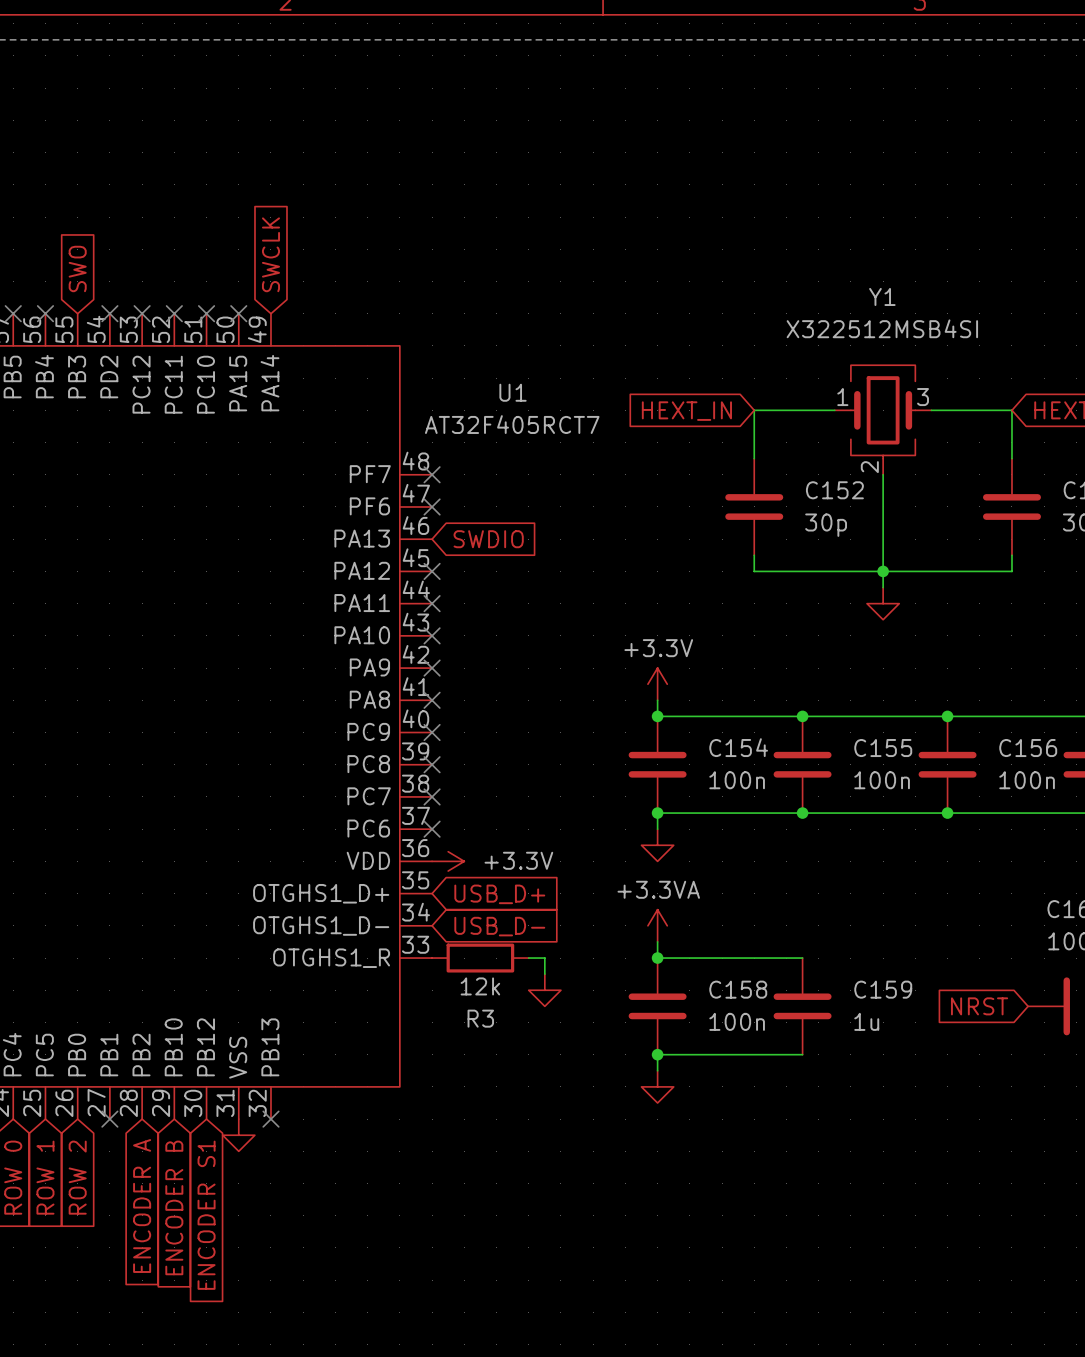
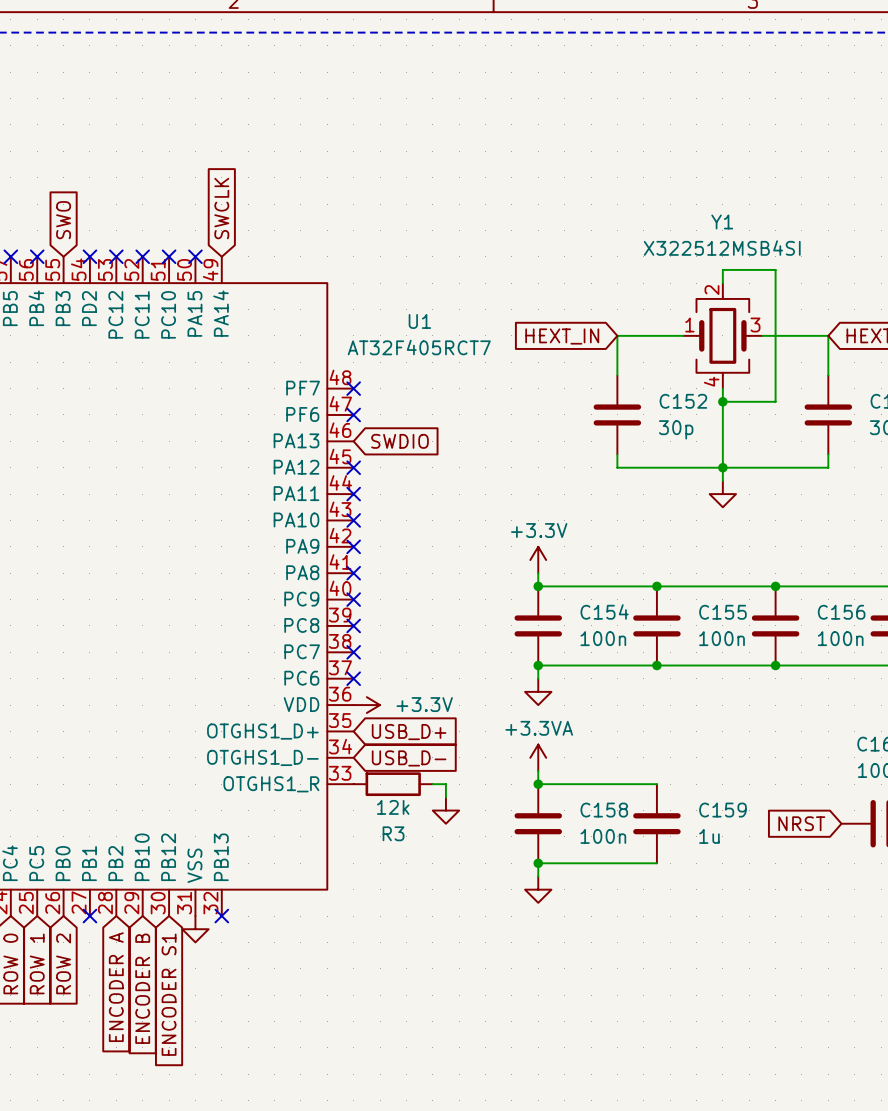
wire: none -> (722, 283) (722, 269) (775, 269) (775, 401) (722, 401)
Y1 symbol: [834, 365, 932, 475] -> [683, 283, 763, 389]
junction: none -> (722, 401)

